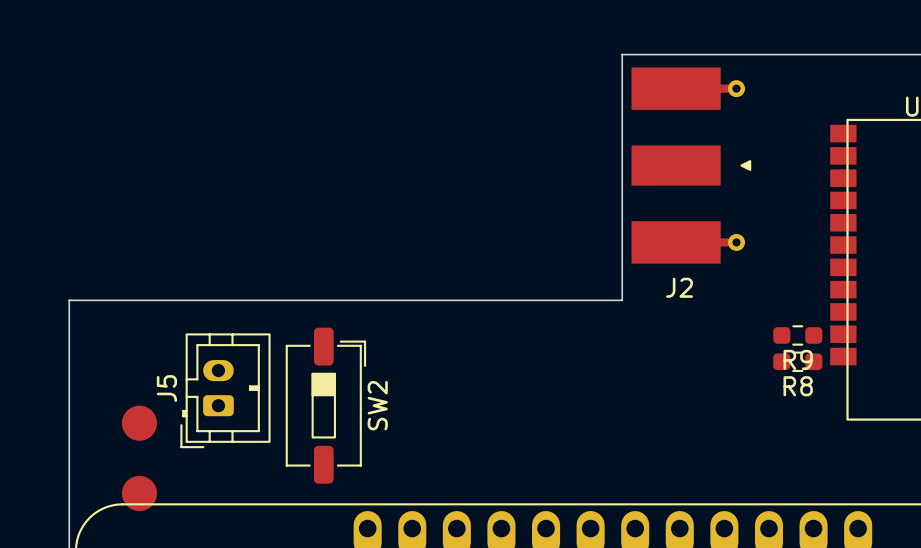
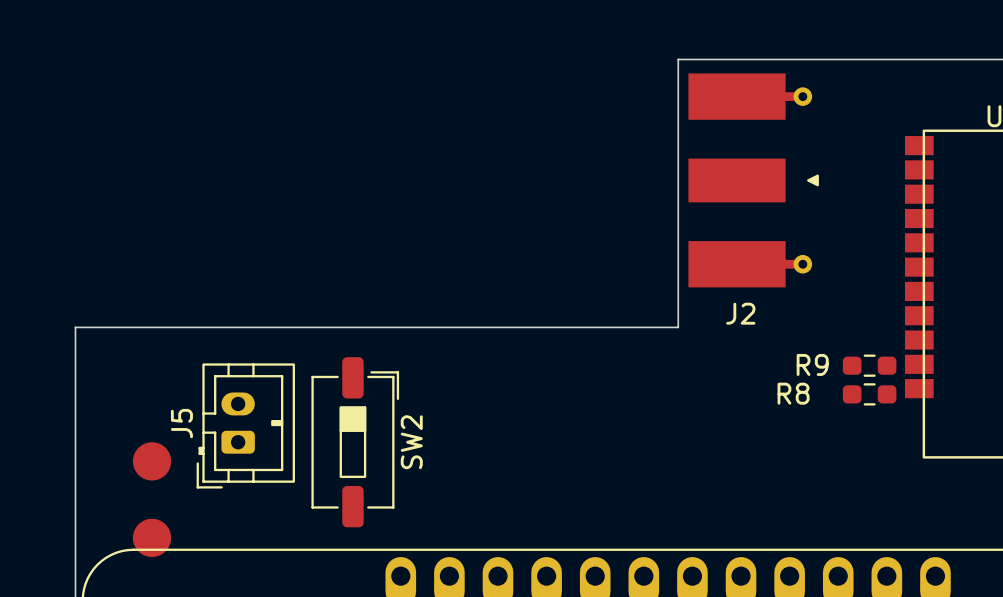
R9 name position: R9 (798, 359) -> R9 (812, 364)
R8 name position: R8 (798, 386) -> R8 (793, 393)

